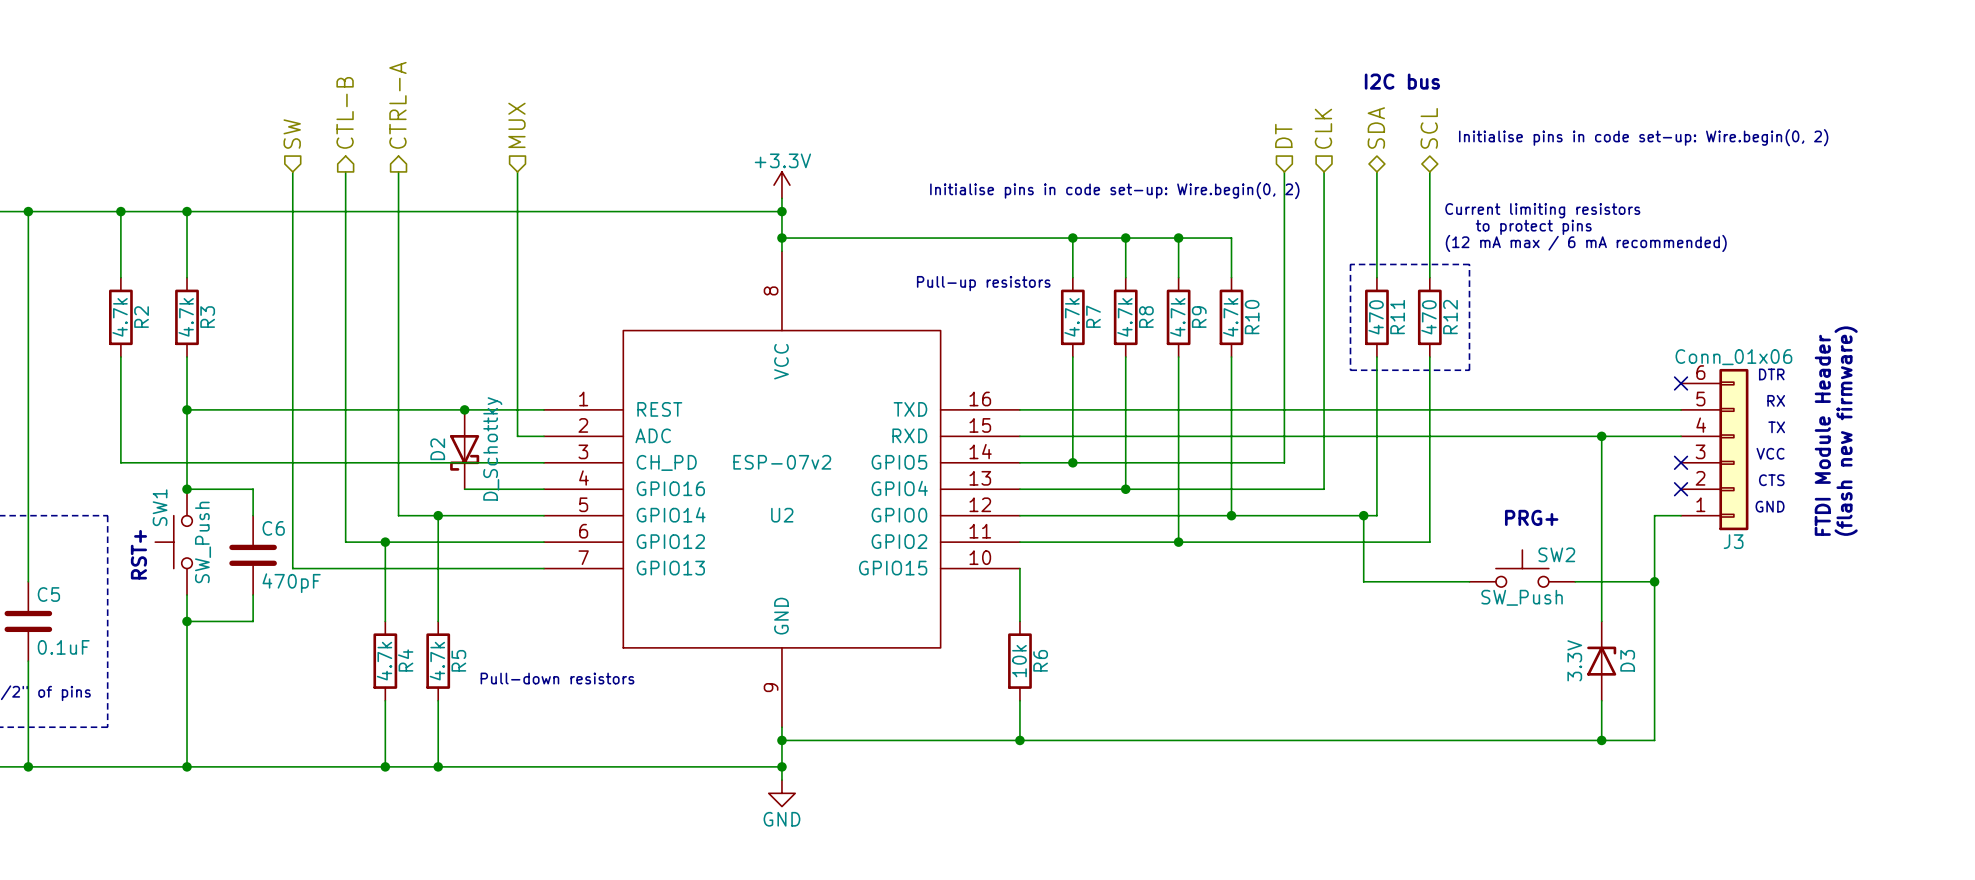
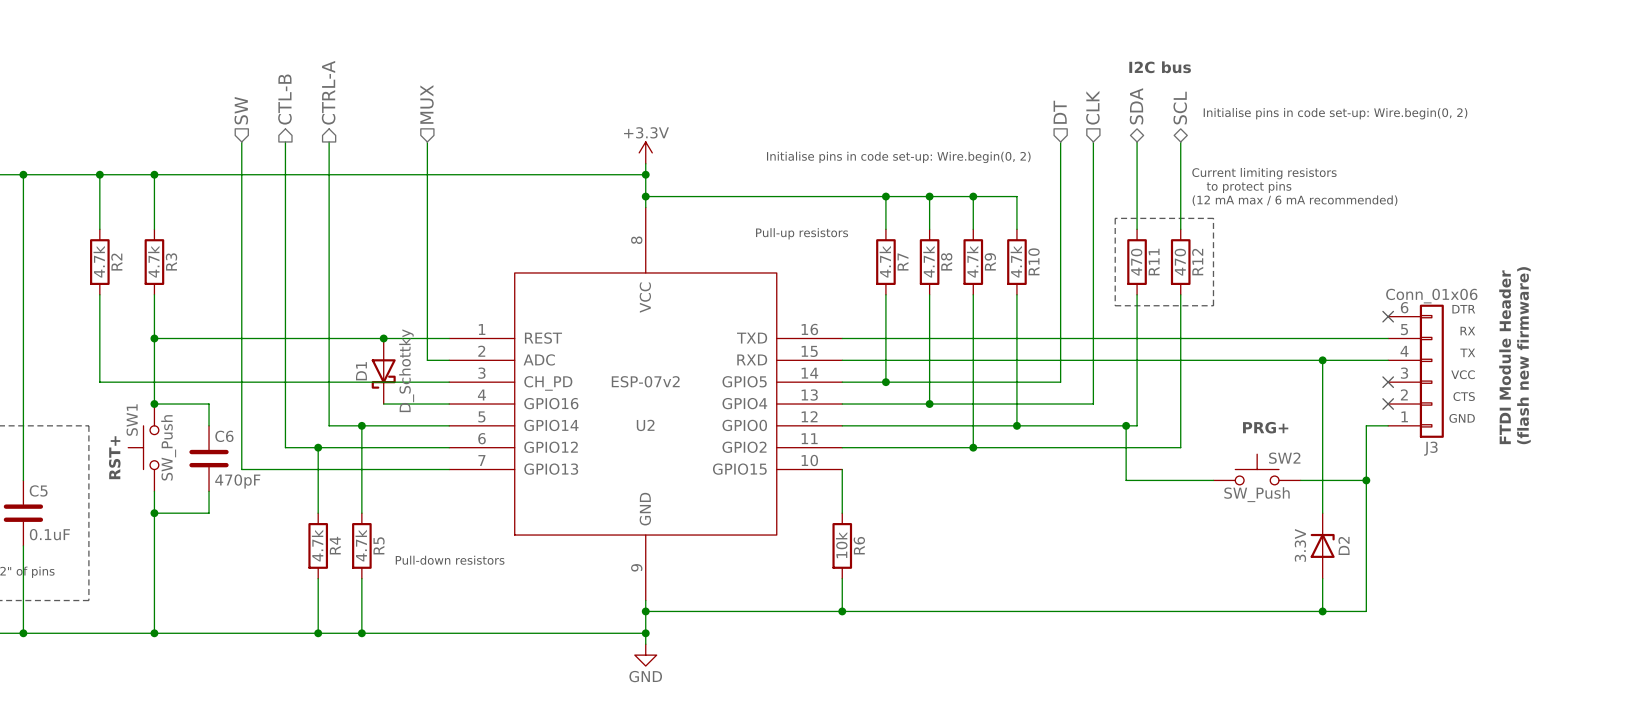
D2 name: D2 (437, 449) -> D1 (361, 371)
D3 name: D3 (1627, 660) -> D2 (1343, 545)

